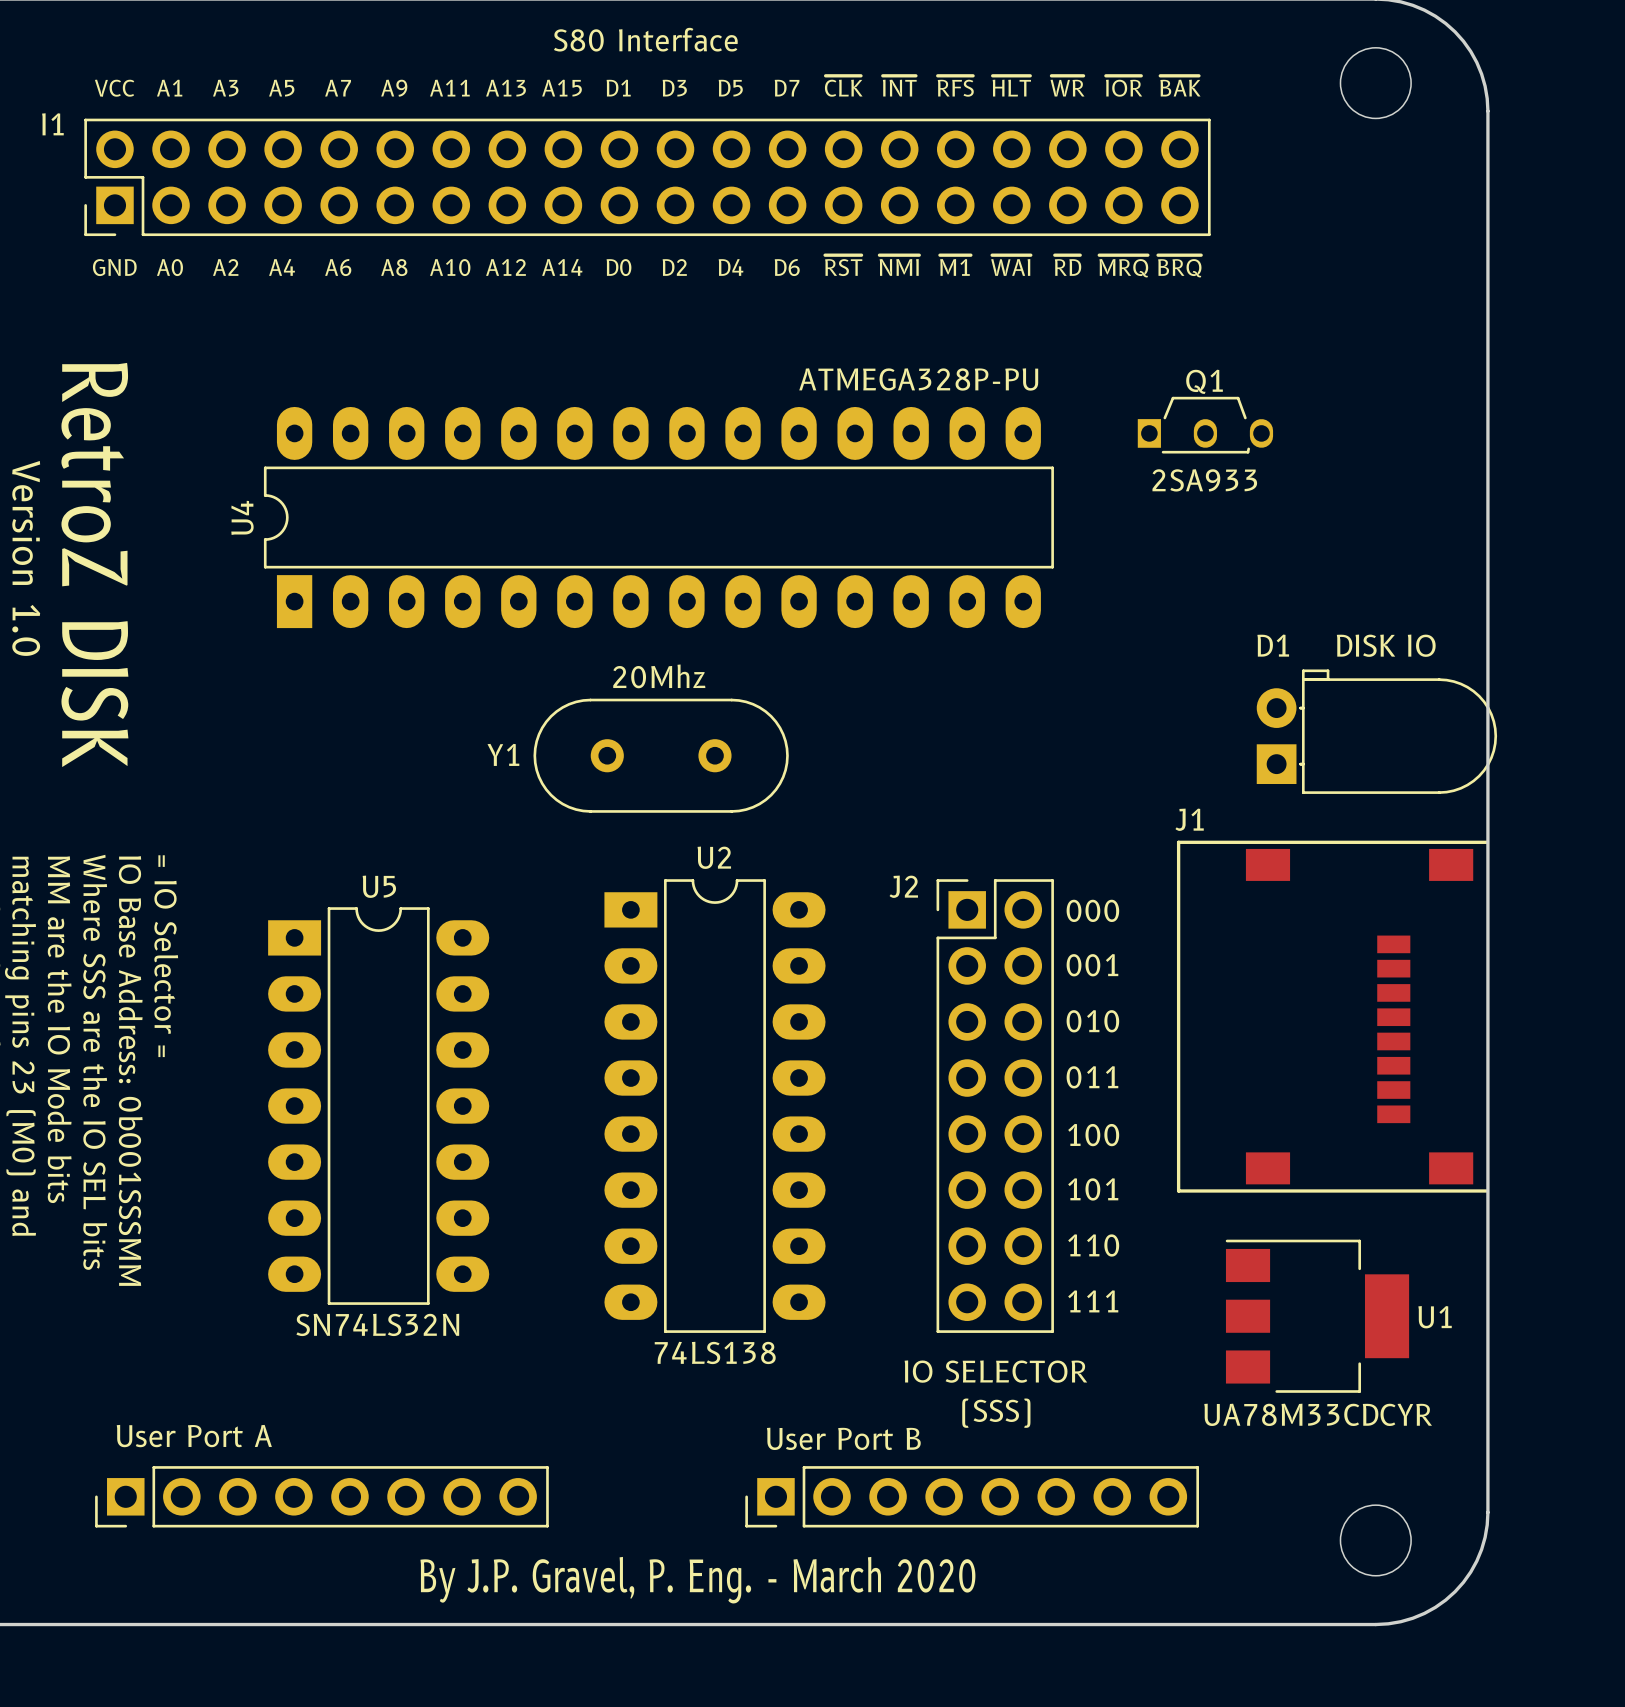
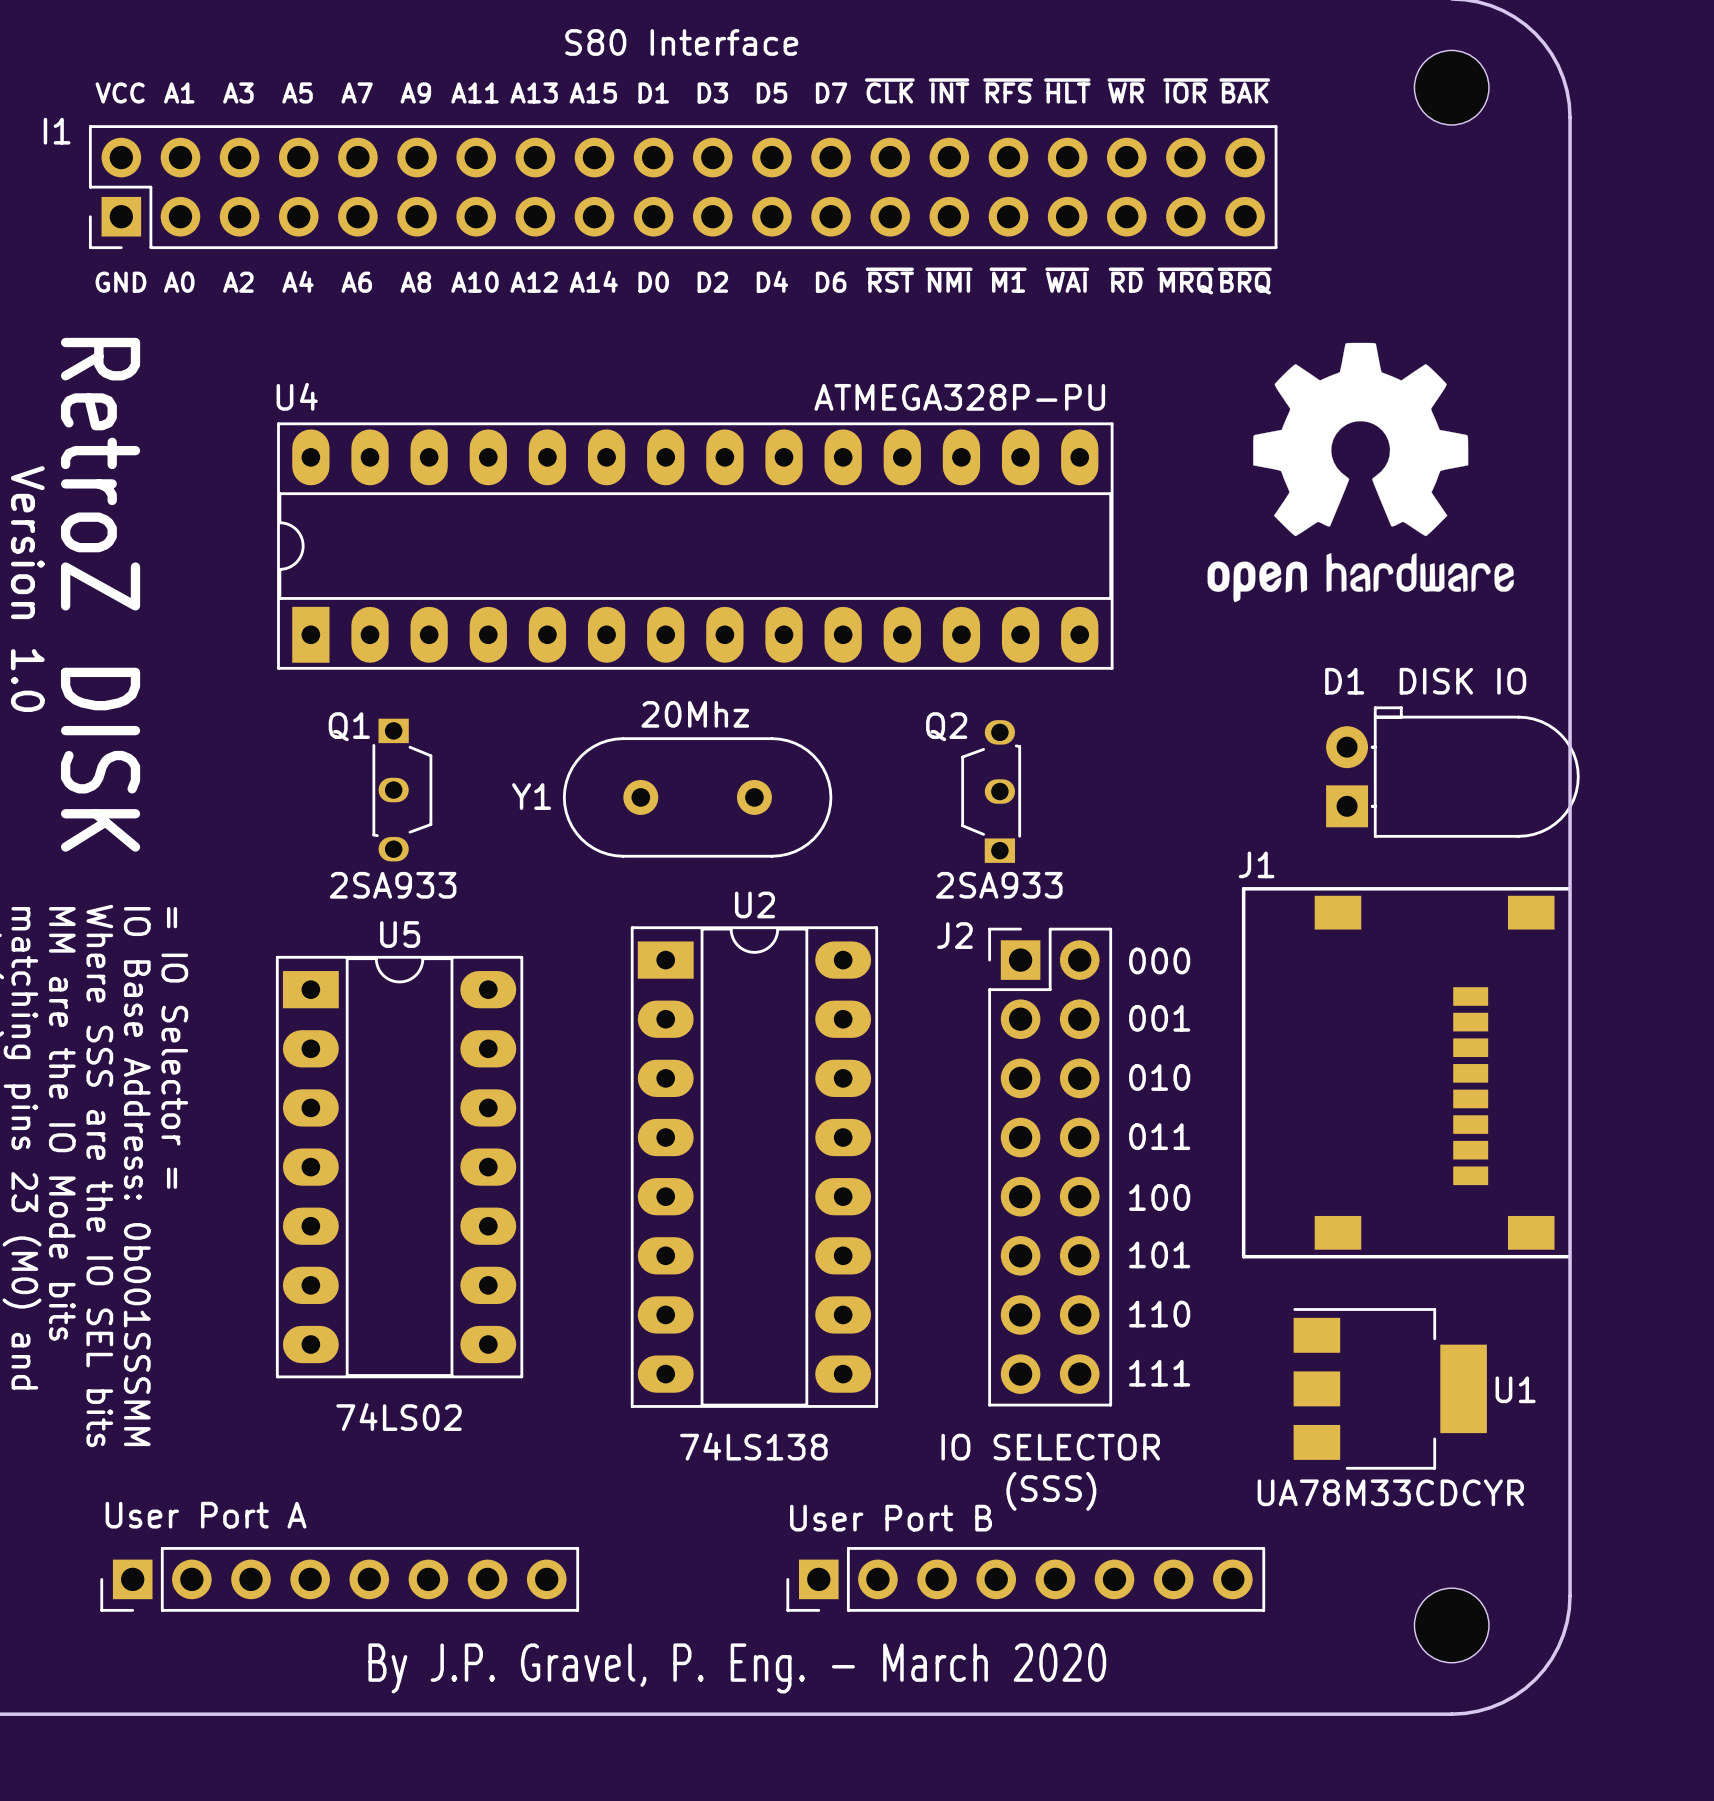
drawing: none -> [1207, 342, 1514, 603]
Q1 name position: Q1 (1204, 381) -> Q1 (349, 726)
U4 footprint: [263, 406, 1054, 629] -> [277, 422, 1114, 670]
Q1 rotation: 0° (1205, 425) -> 90° clockwise (402, 790)
Q1 position: (1205, 425) -> (402, 790)
U4 name position: U4 (242, 517) -> U4 (297, 396)
Q2: none -> 2SA933 (991, 791)
U2 footprint: [604, 879, 826, 1333] -> [630, 926, 879, 1408]
U5 footprint: [268, 907, 490, 1305] -> [275, 955, 524, 1379]
U5 value: SN74LS32N (377, 1324) -> 74LS02 (399, 1417)

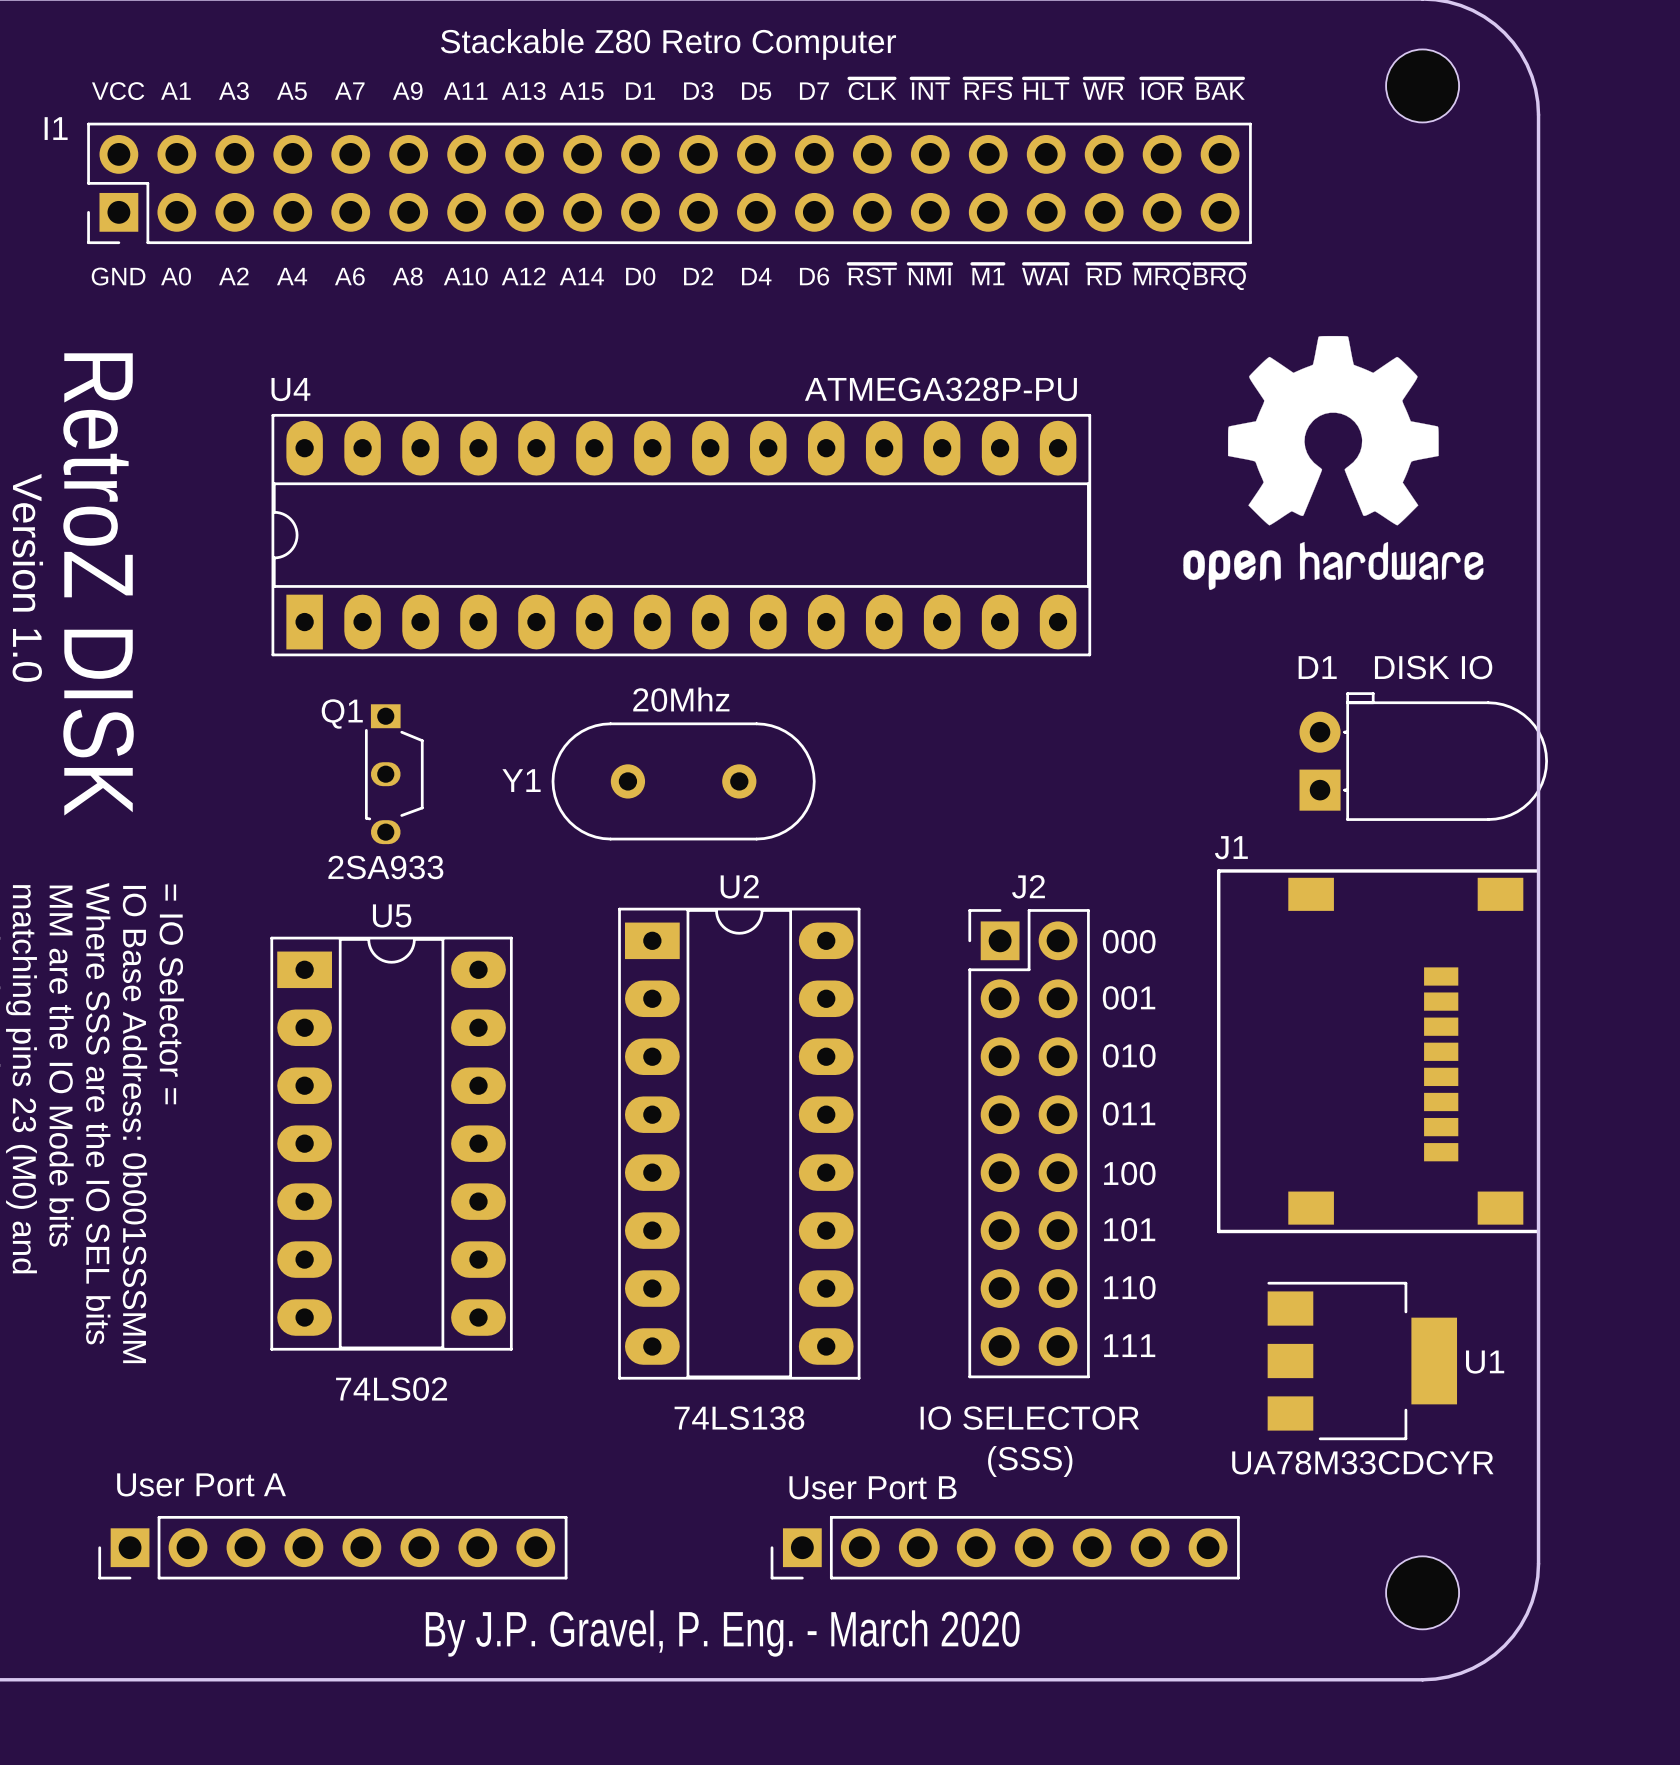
I1 value: S80 Interface (681, 42) -> Stackable Z80 Retro Computer (668, 44)
Q2: 2SA933 (991, 791) -> none
J2 name position: J2 (954, 935) -> J2 (1028, 886)

